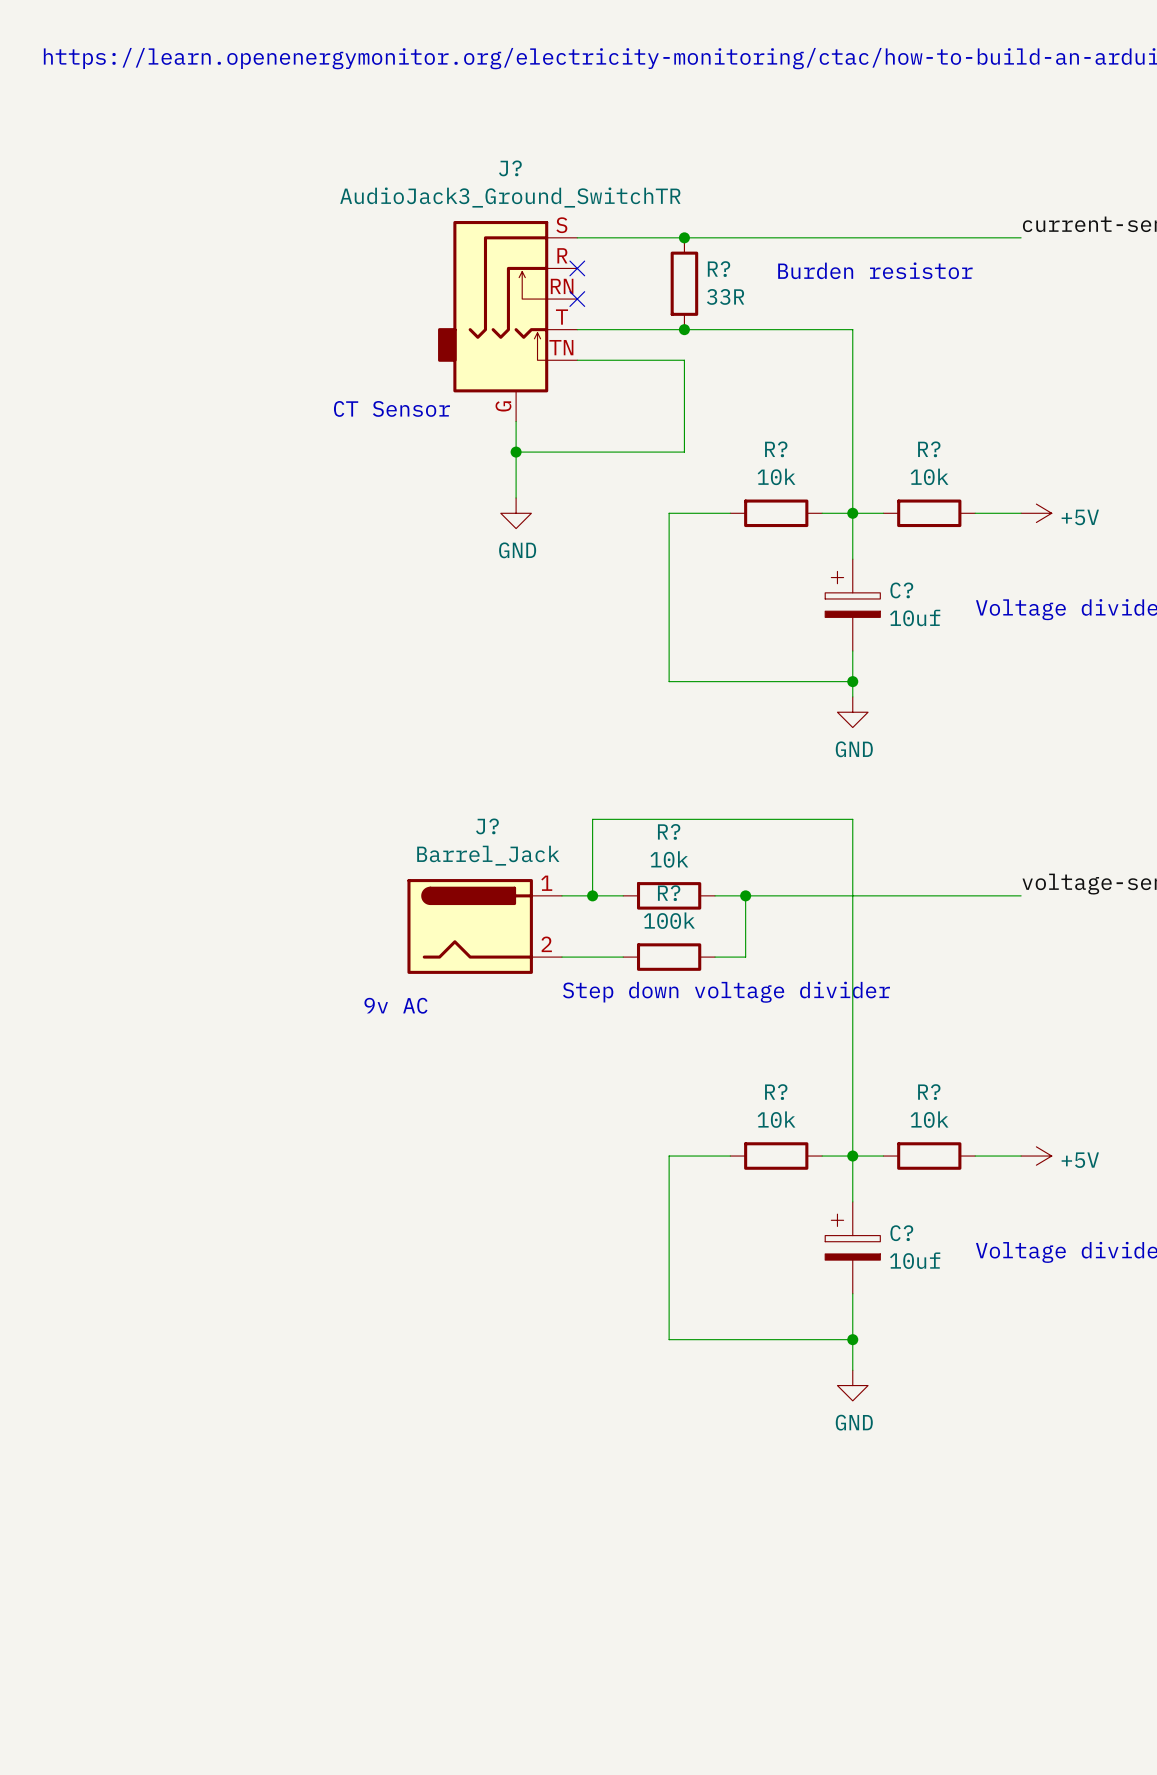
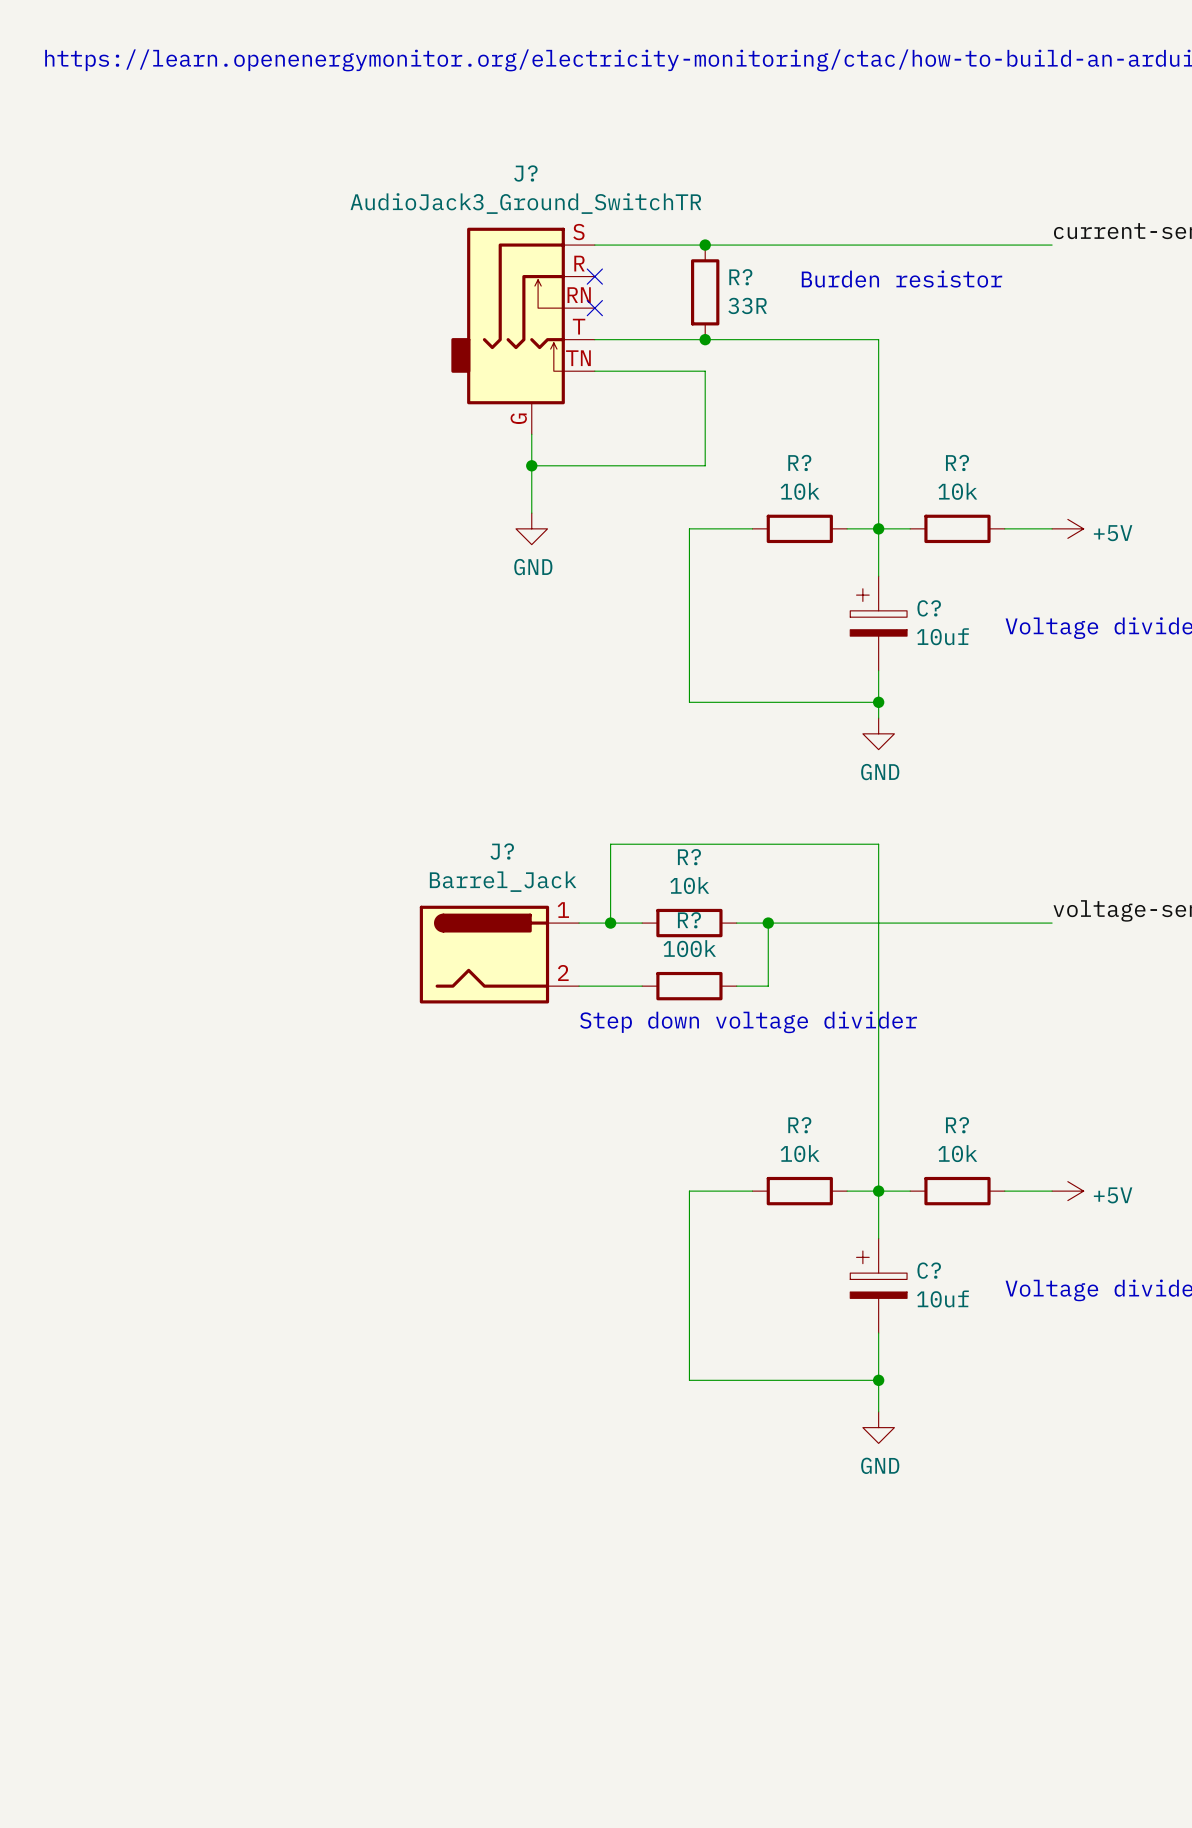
text: CT Sensor (391, 408) -> none
text: 9v AC (395, 1005) -> none

